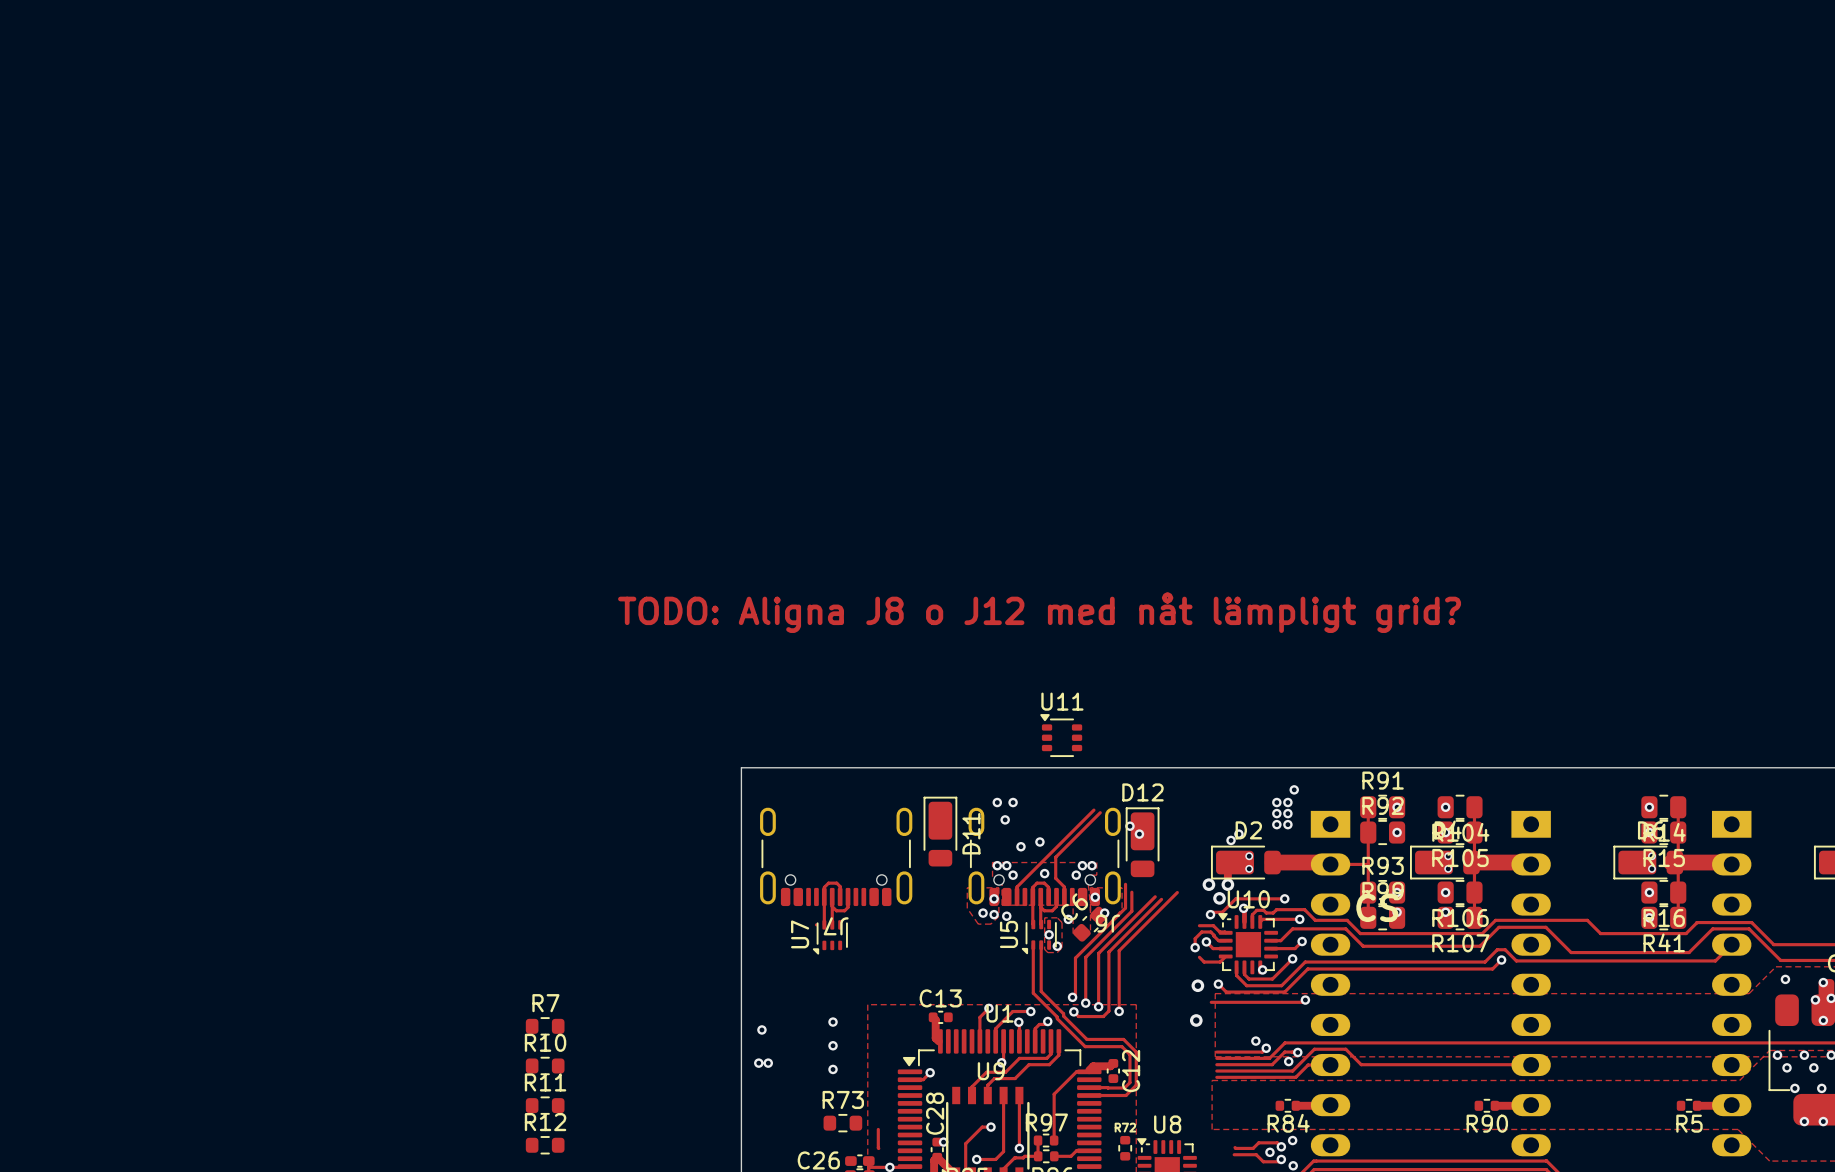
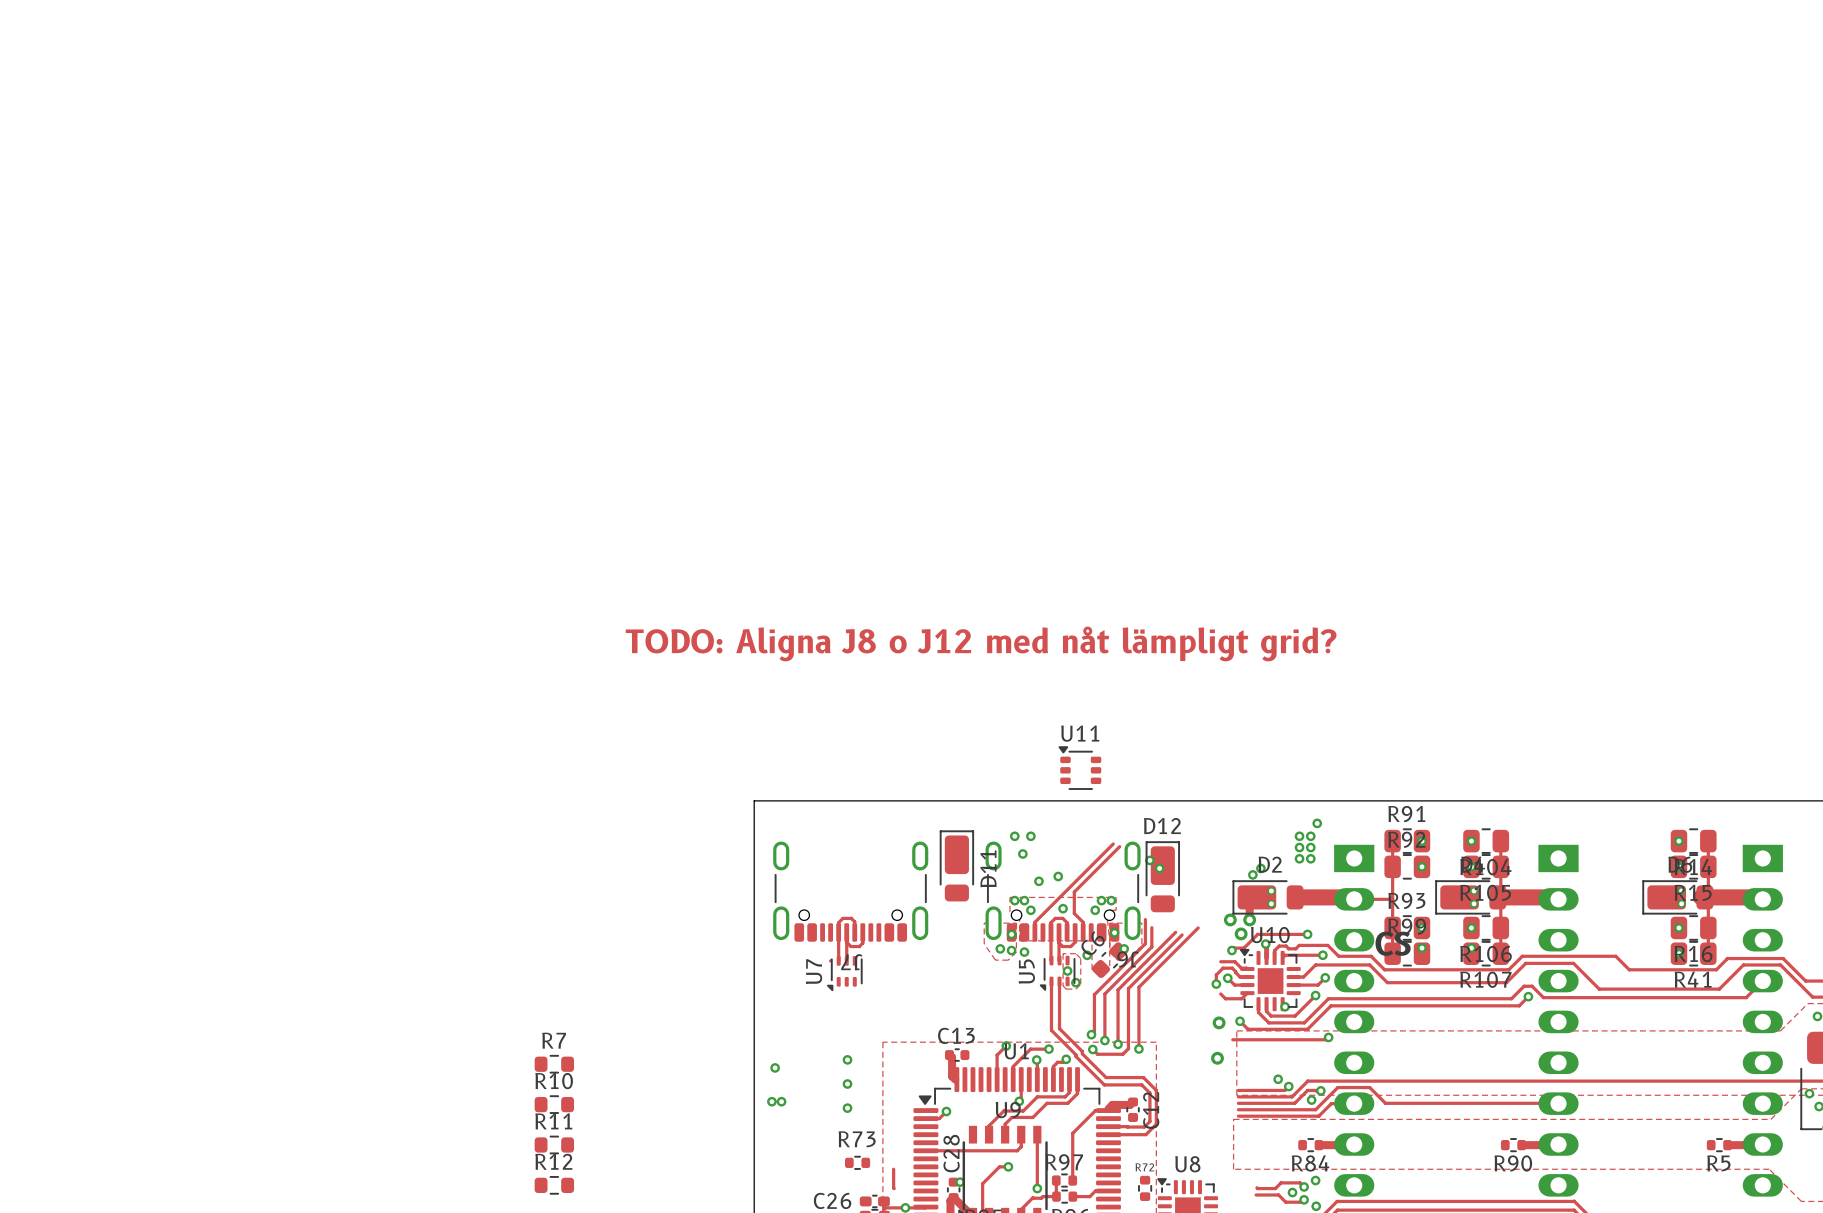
track: (1003, 1107) (1003, 1151) (995, 1159) (976, 1159) -> (1021, 1146) (1017, 1150) (925, 1150)
R73 footprint: [823, 1113, 863, 1133] -> [845, 1155, 871, 1170]
via: (976, 1159) -> none

